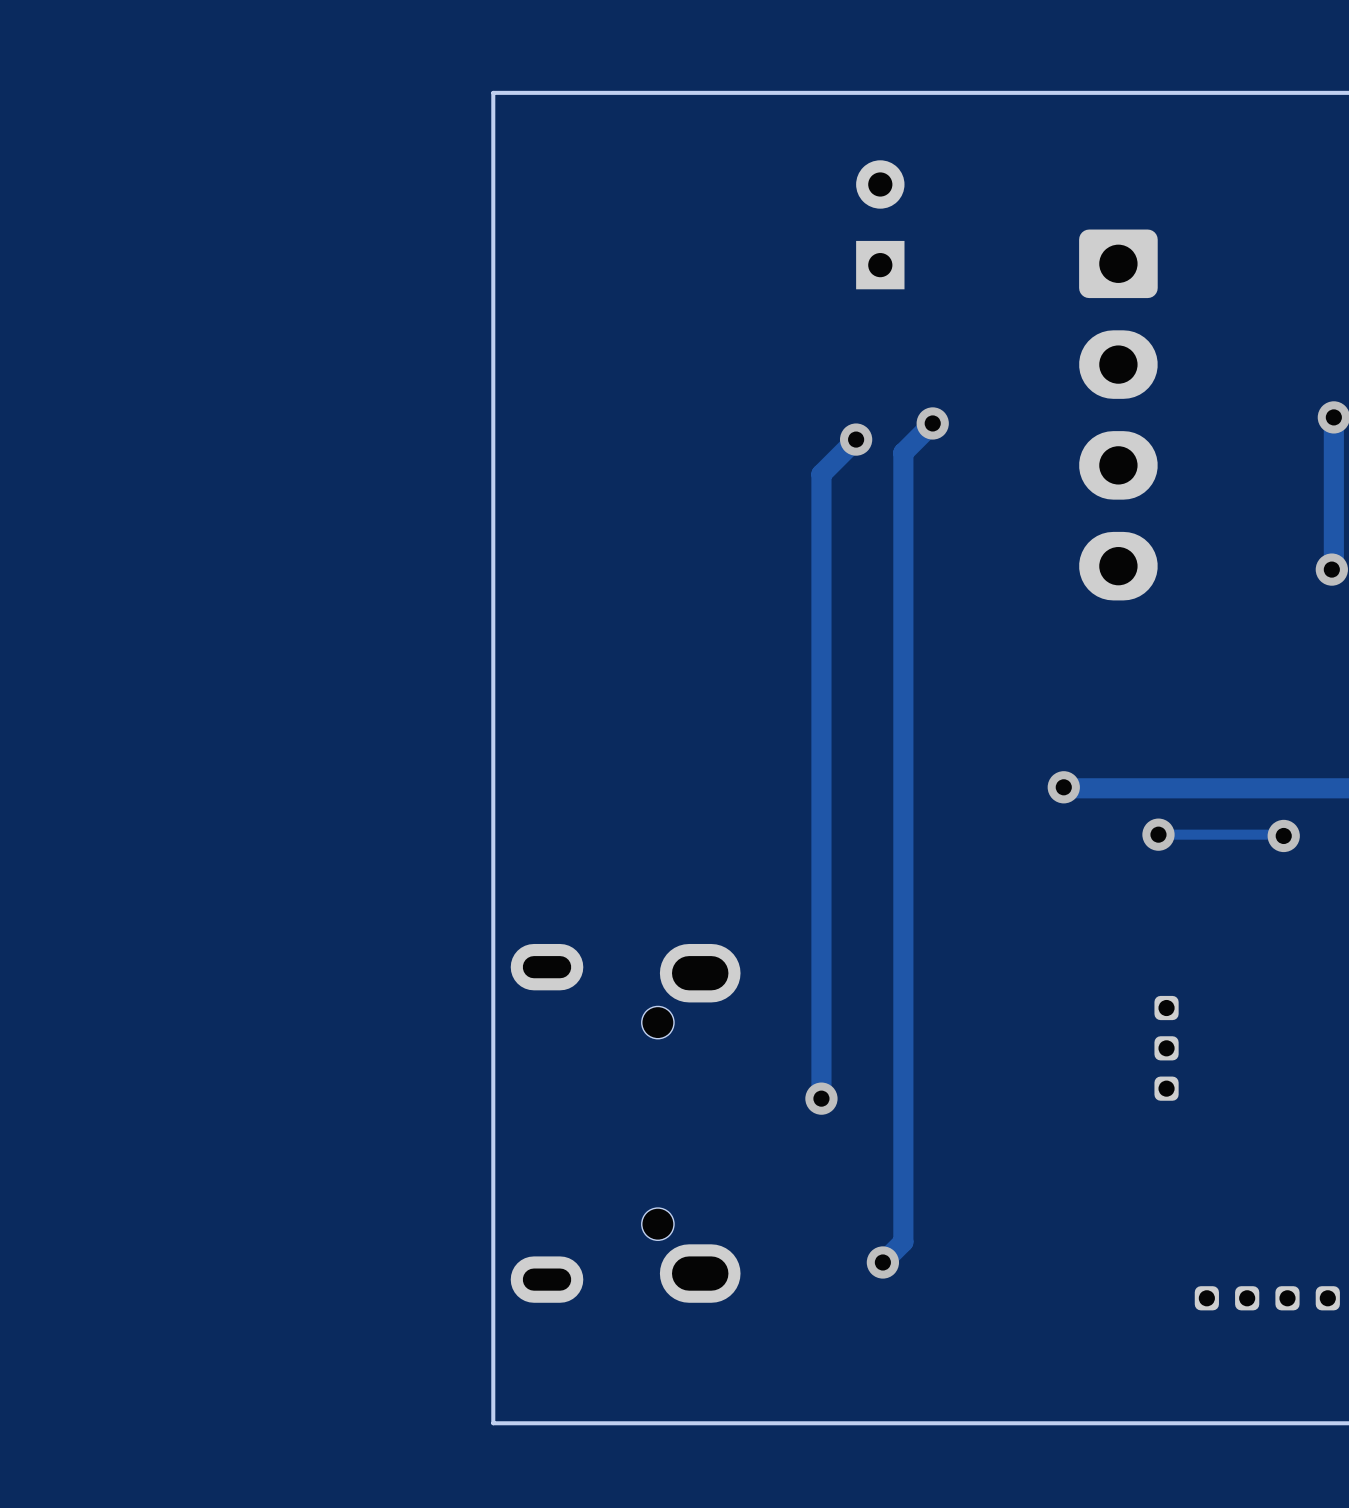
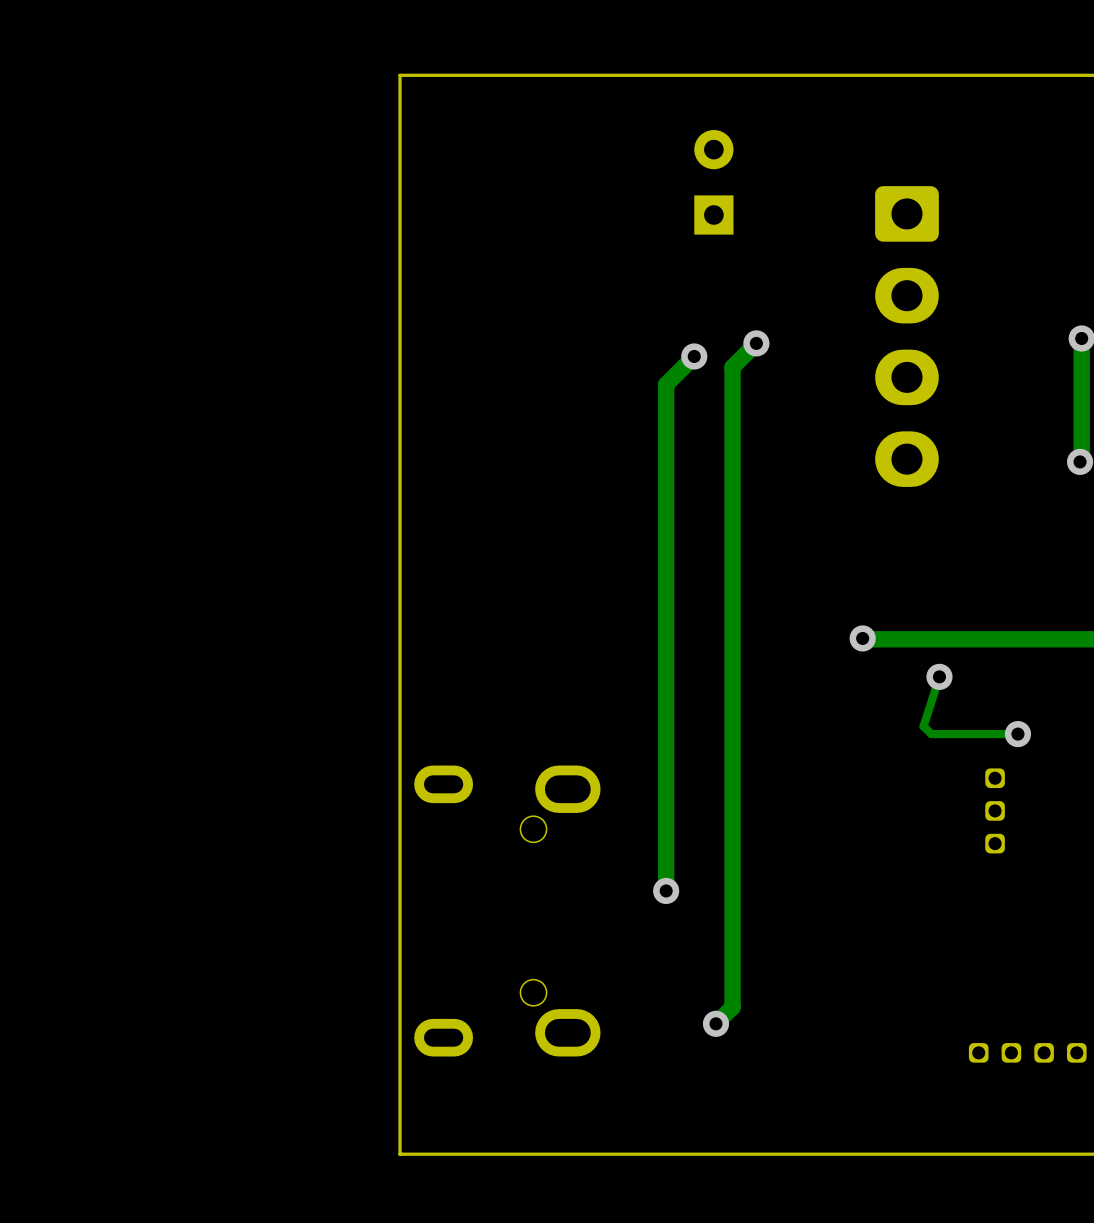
track: (1158, 834) (1283, 835) -> (939, 676) (923, 726) (931, 734) (1017, 734)
via position: (1283, 835) -> (1017, 734)
part position: (1166, 1048) -> (995, 810)

